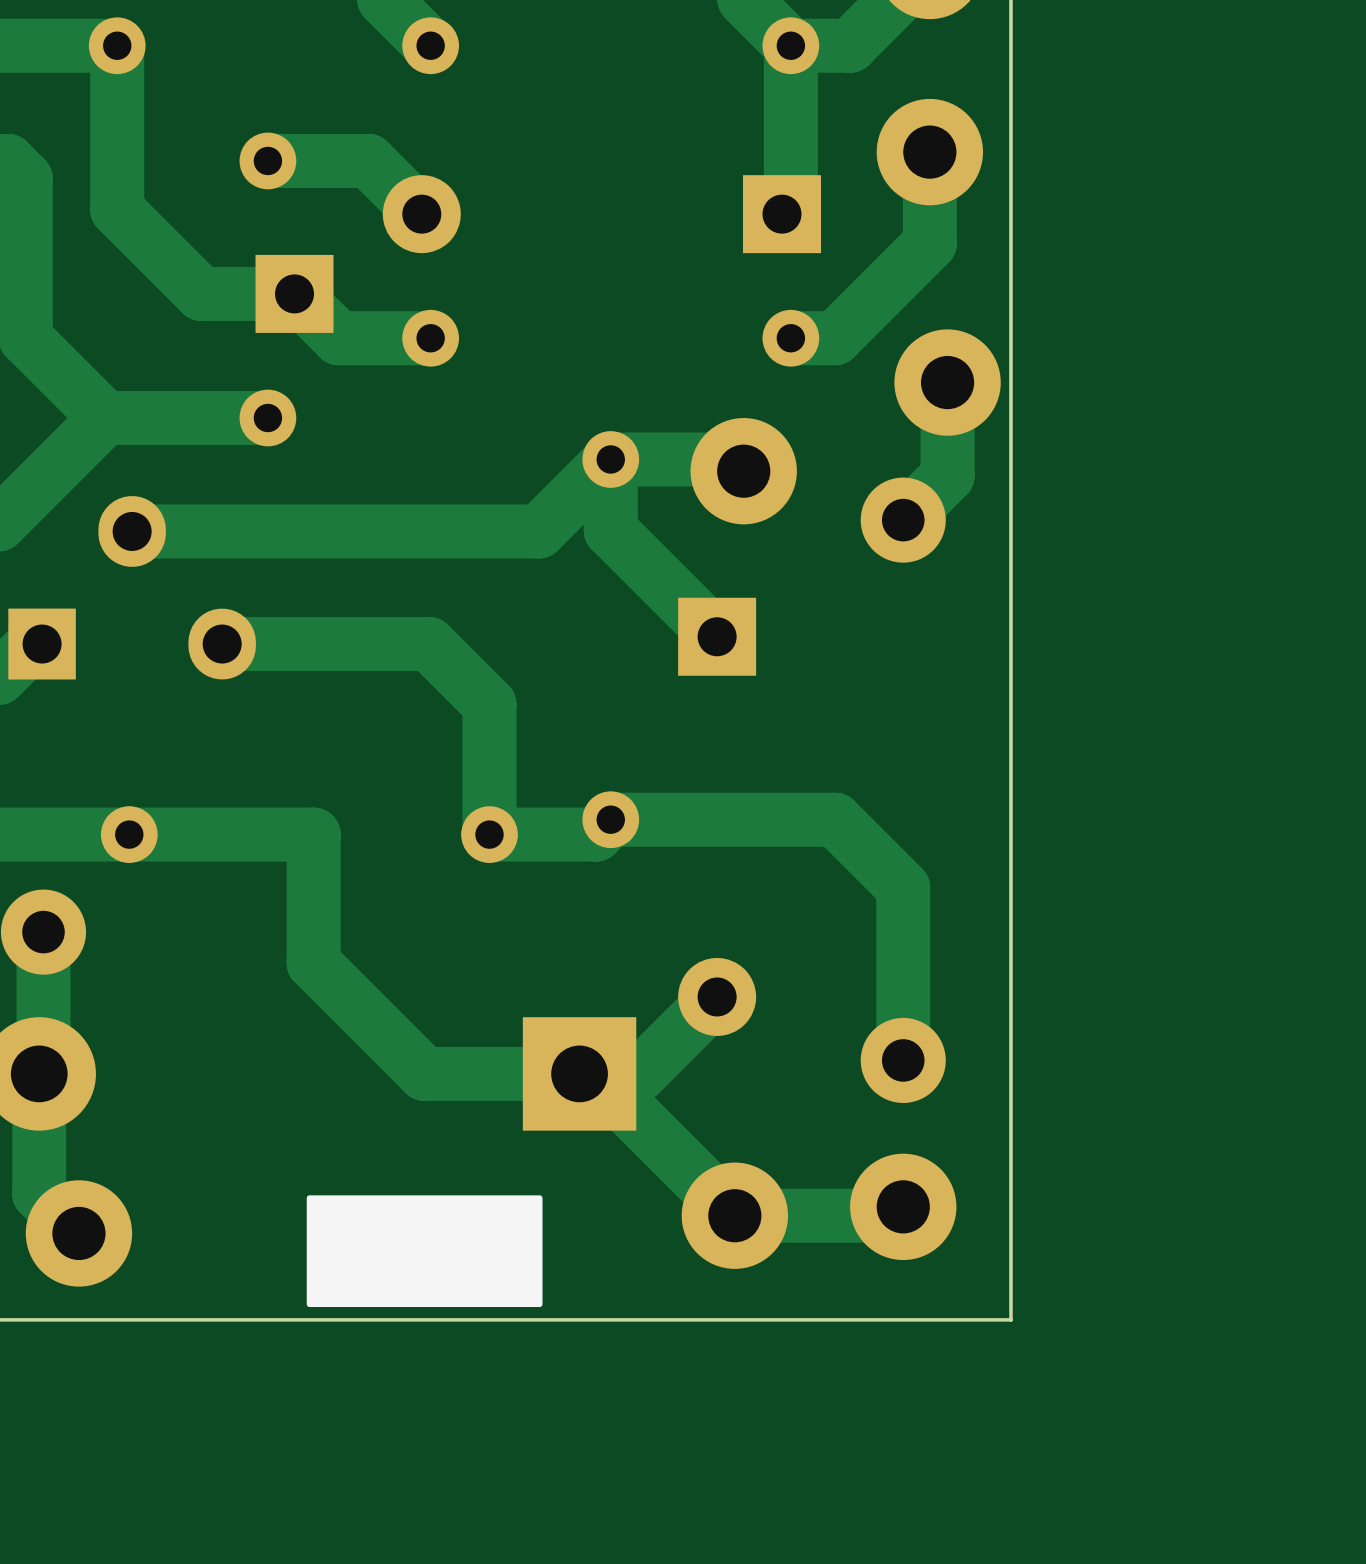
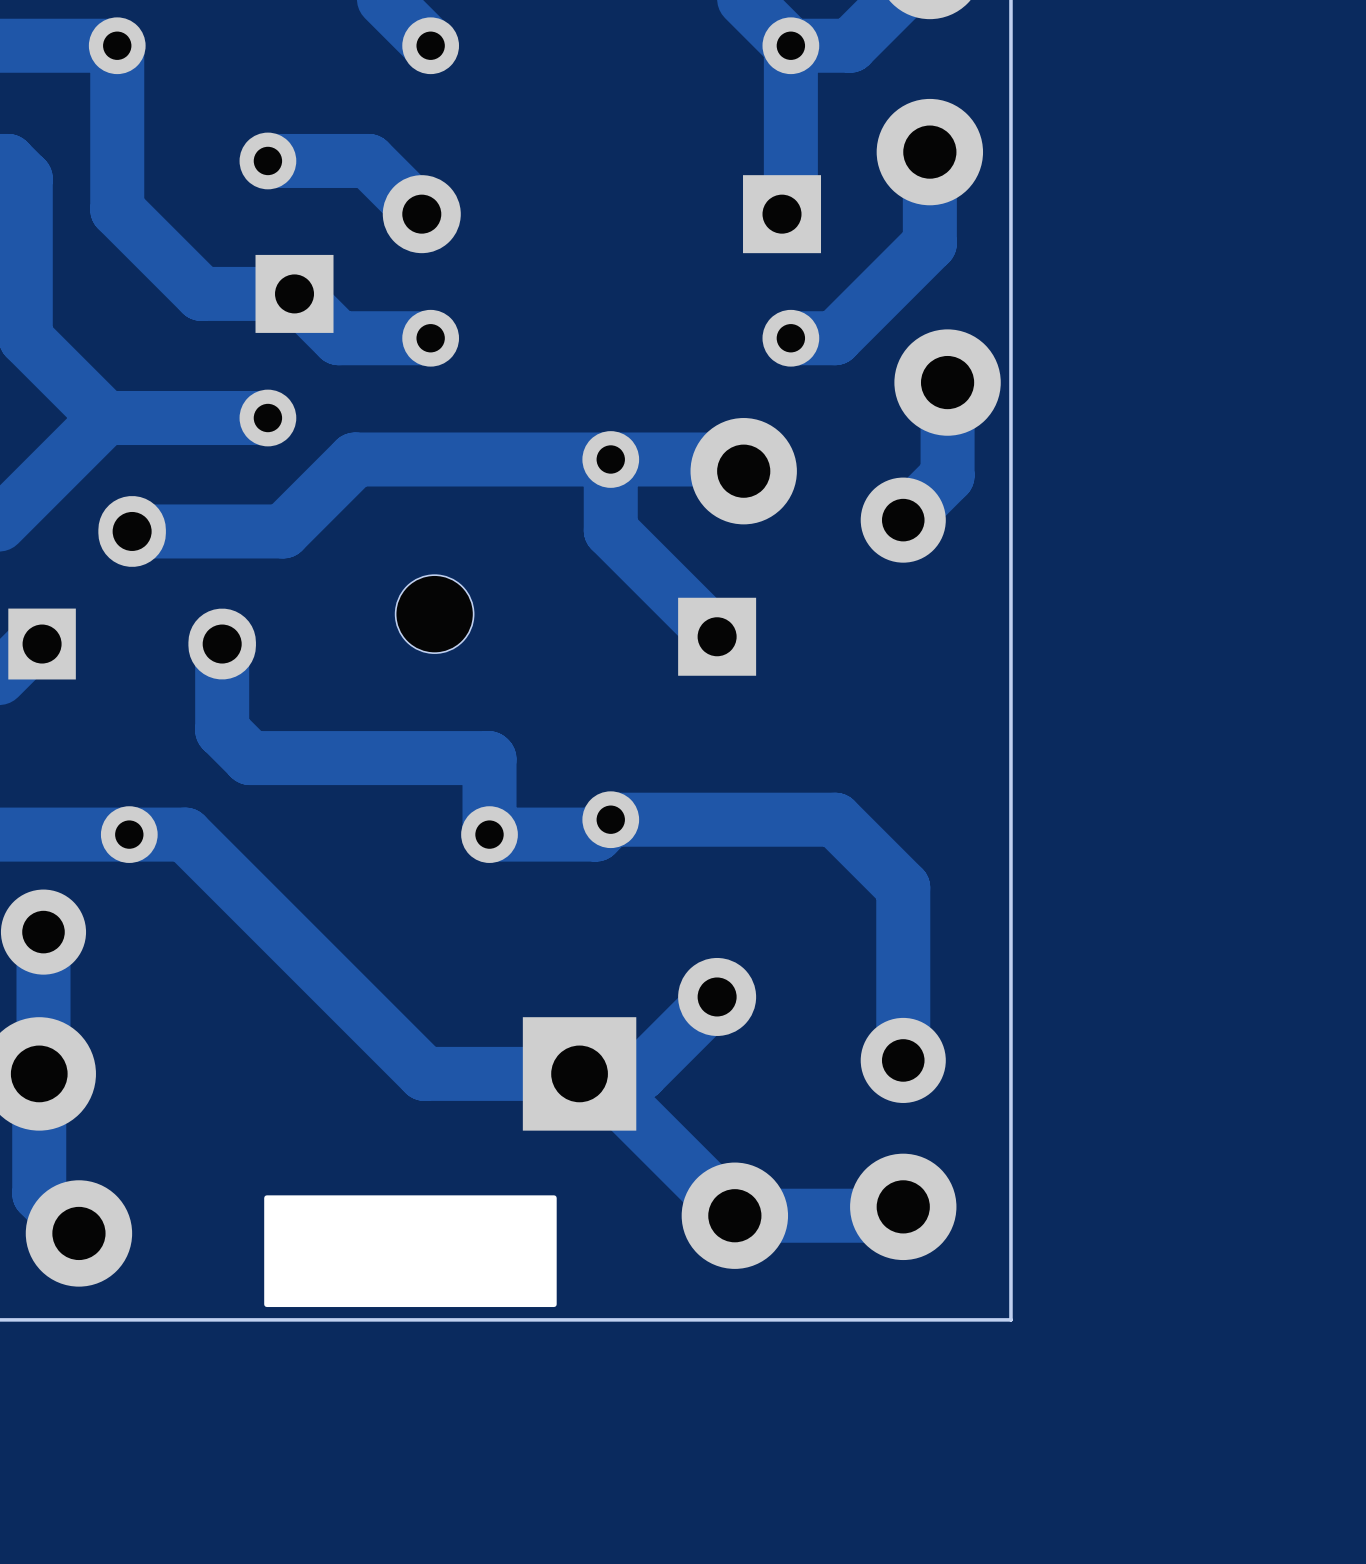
track: (610, 459) (538, 531) (283, 531) -> (610, 459) (355, 459) (283, 531)
part: none -> (434, 614)
track: (222, 644) (429, 644) (489, 704) (489, 759) -> (222, 644) (222, 730) (250, 758) (489, 759)
track: (185, 834) (313, 834) (313, 962) -> (185, 834) (313, 962)
drawing shape: [306, 1195, 543, 1308] -> [264, 1195, 557, 1308]

